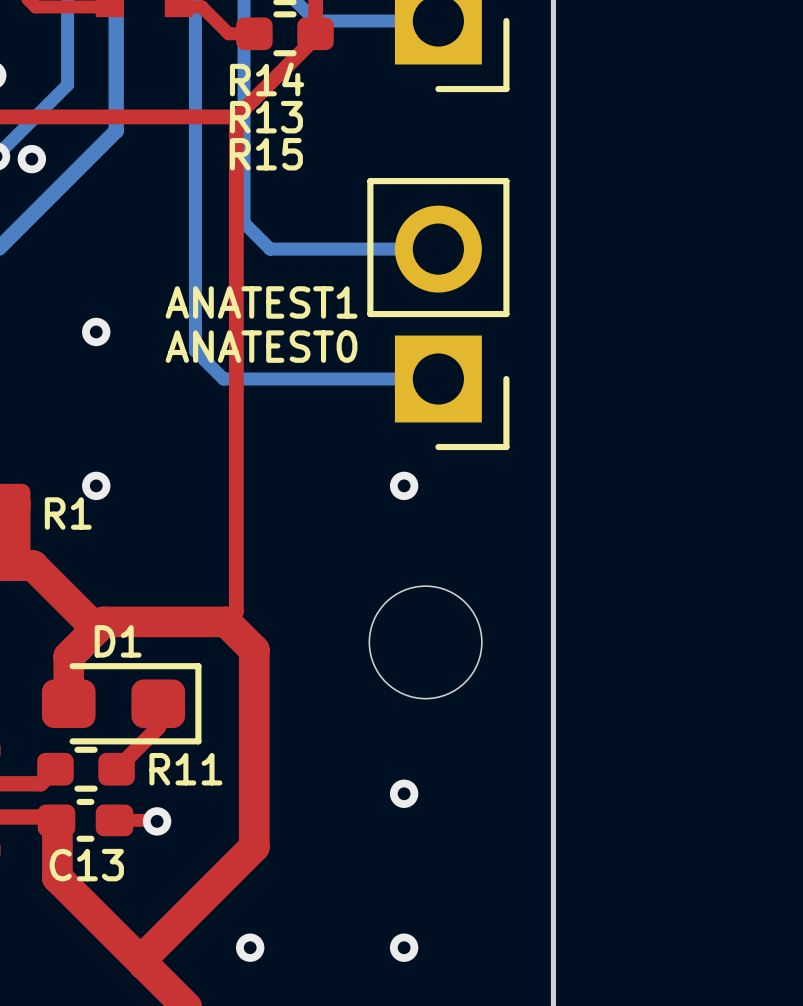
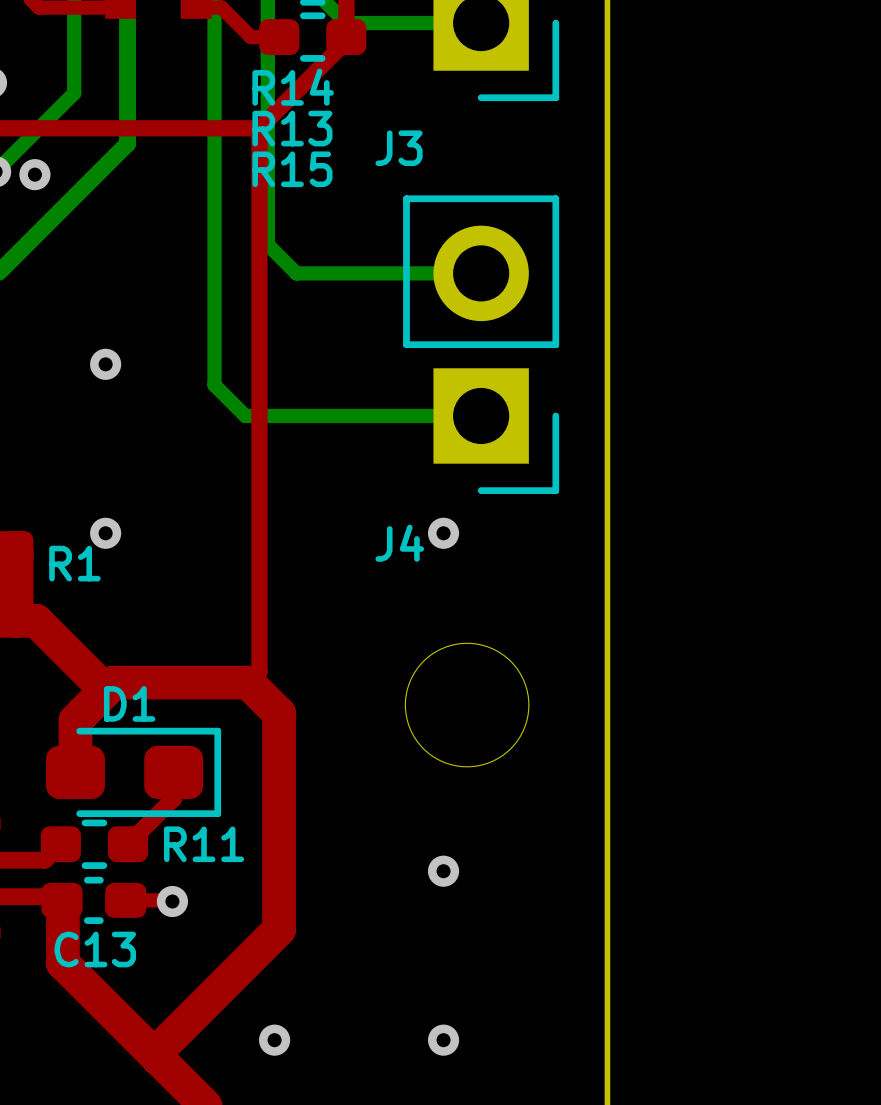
J3 name: none -> J3 (399, 148)
text: ANATEST1 (261, 302) -> none
text: ANATEST0 (261, 346) -> none
J4 name: none -> J4 (399, 543)

